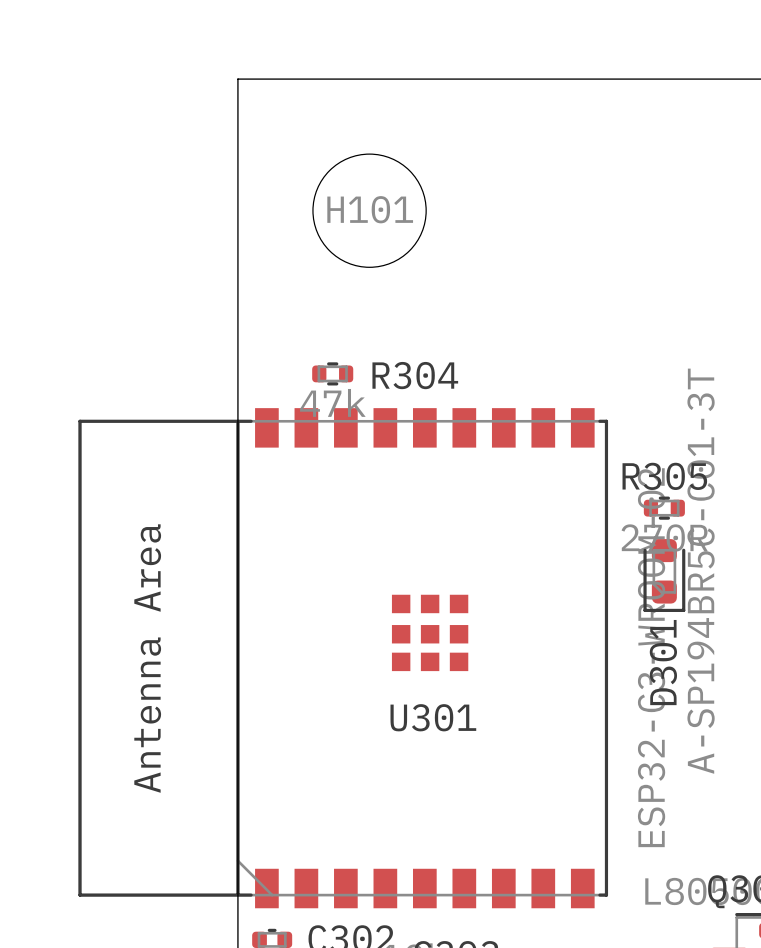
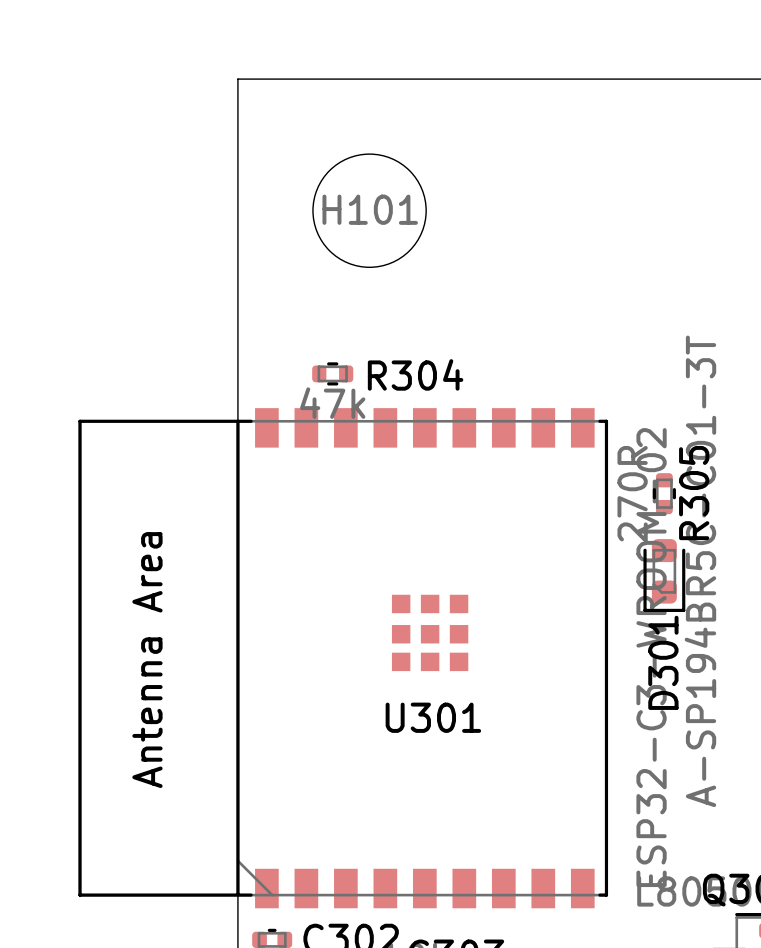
R305 rotation: 0° (664, 508) -> 90° clockwise (664, 493)

